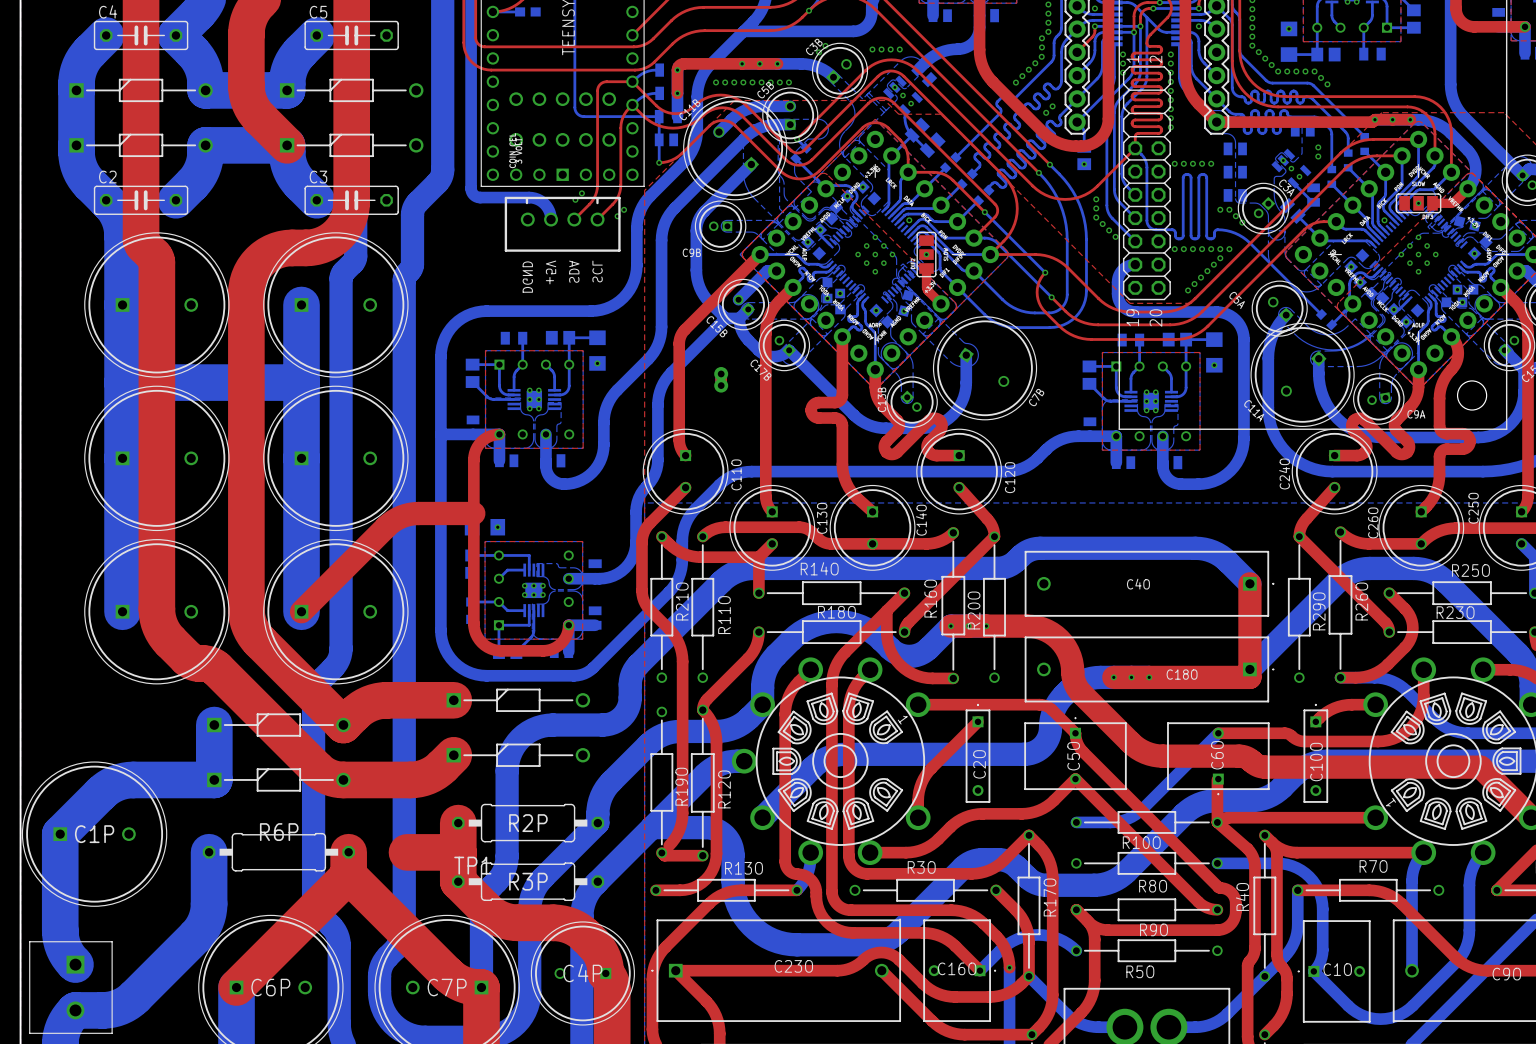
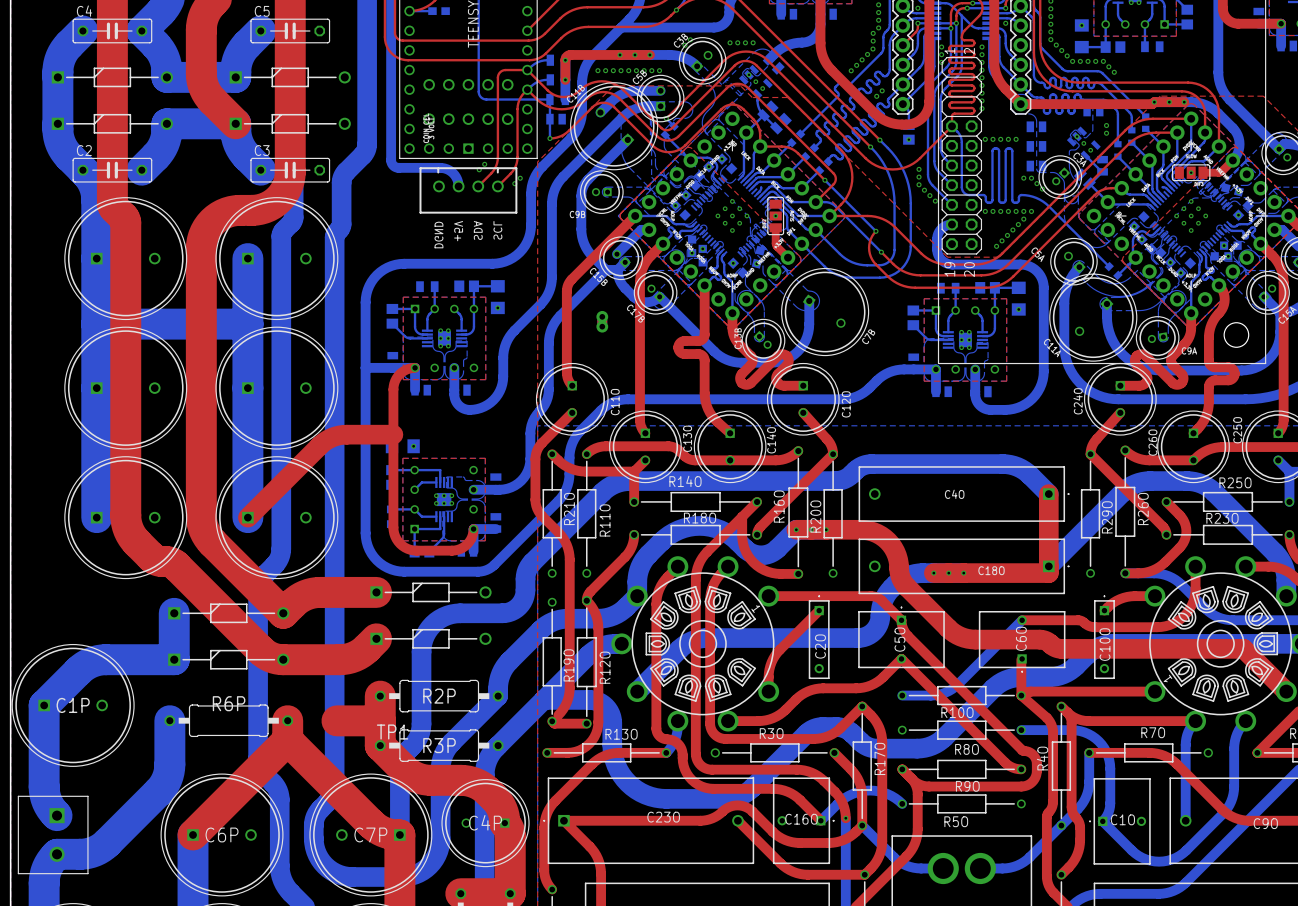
bottom track: none -> (761, 187) (757, 194)
via: (909, 220) -> none
bottom track: none -> (1162, 187) (1169, 191)
via: (1384, 220) -> none
bottom track: (820, 229) (820, 235) (829, 244) -> none
bottom track: (1408, 299) (1399, 309) (1393, 309) -> none

